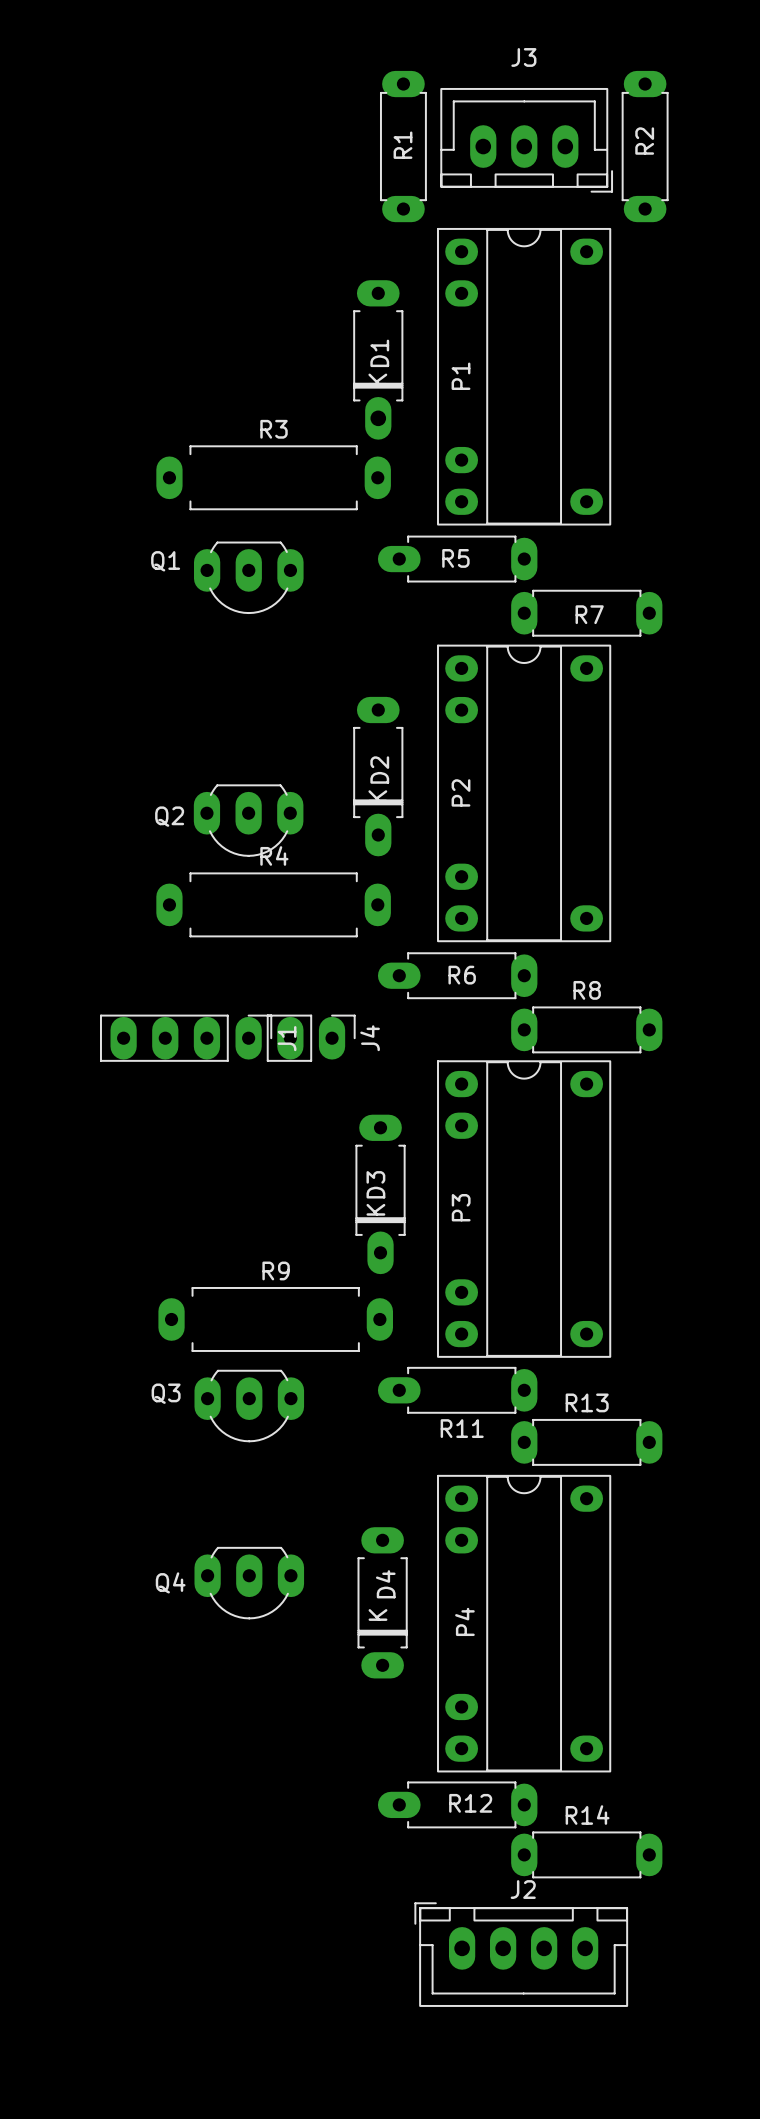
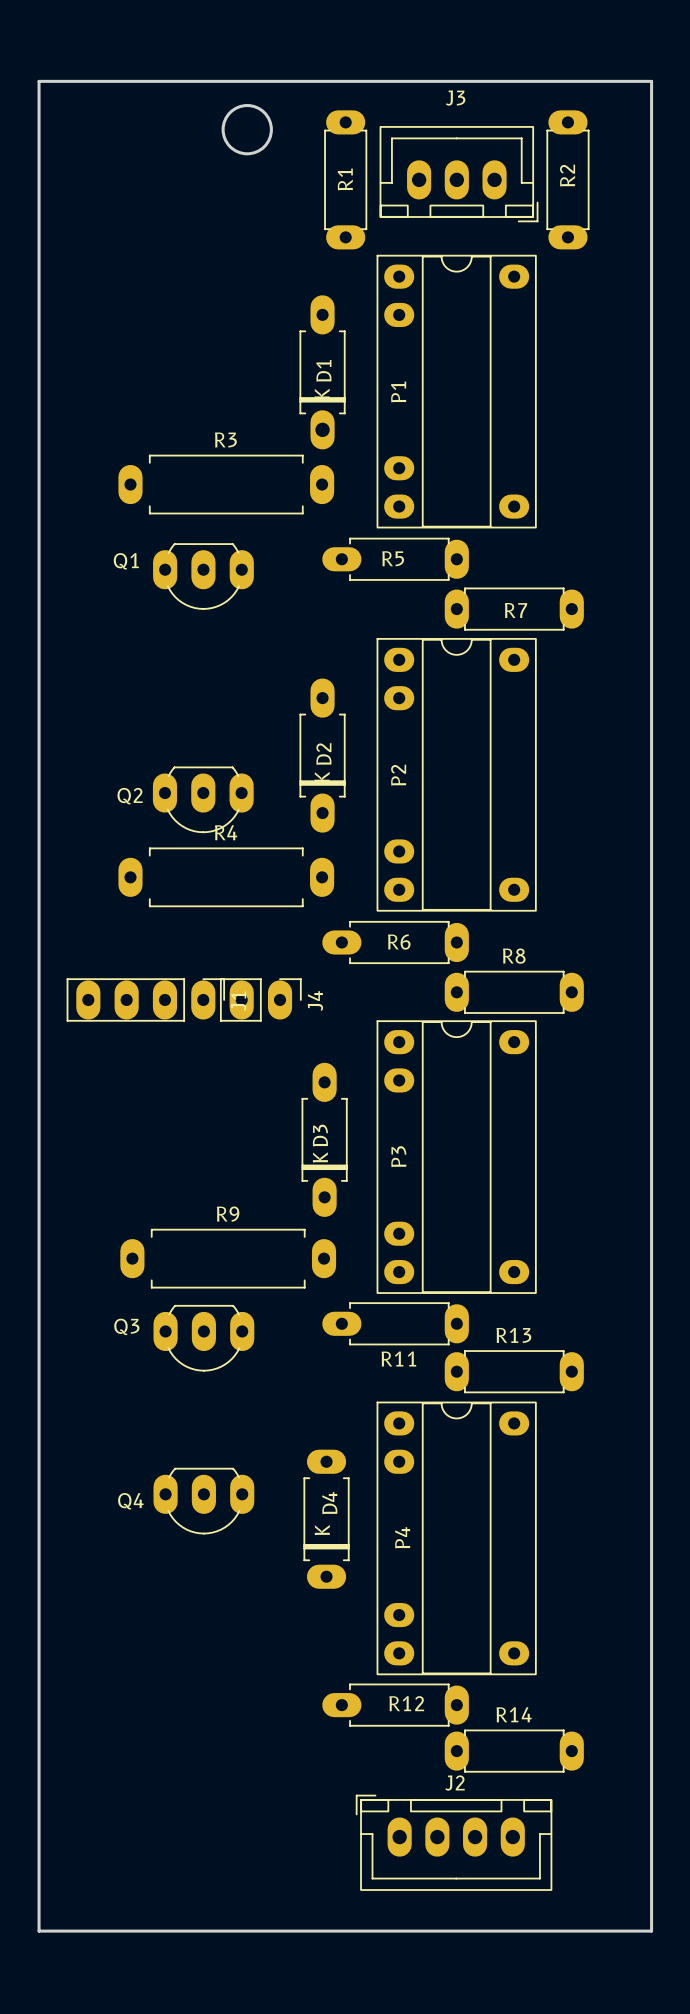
board edge: none -> (39, 81) (651, 81) (651, 1931) (39, 1931) (39, 81)
round board edge: none -> [221, 104, 273, 156]
D1 footprint: [353, 280, 404, 440] -> [299, 295, 346, 450]
D2 footprint: [353, 696, 404, 857] -> [299, 678, 346, 833]
D3 footprint: [355, 1114, 406, 1275] -> [301, 1062, 348, 1217]

